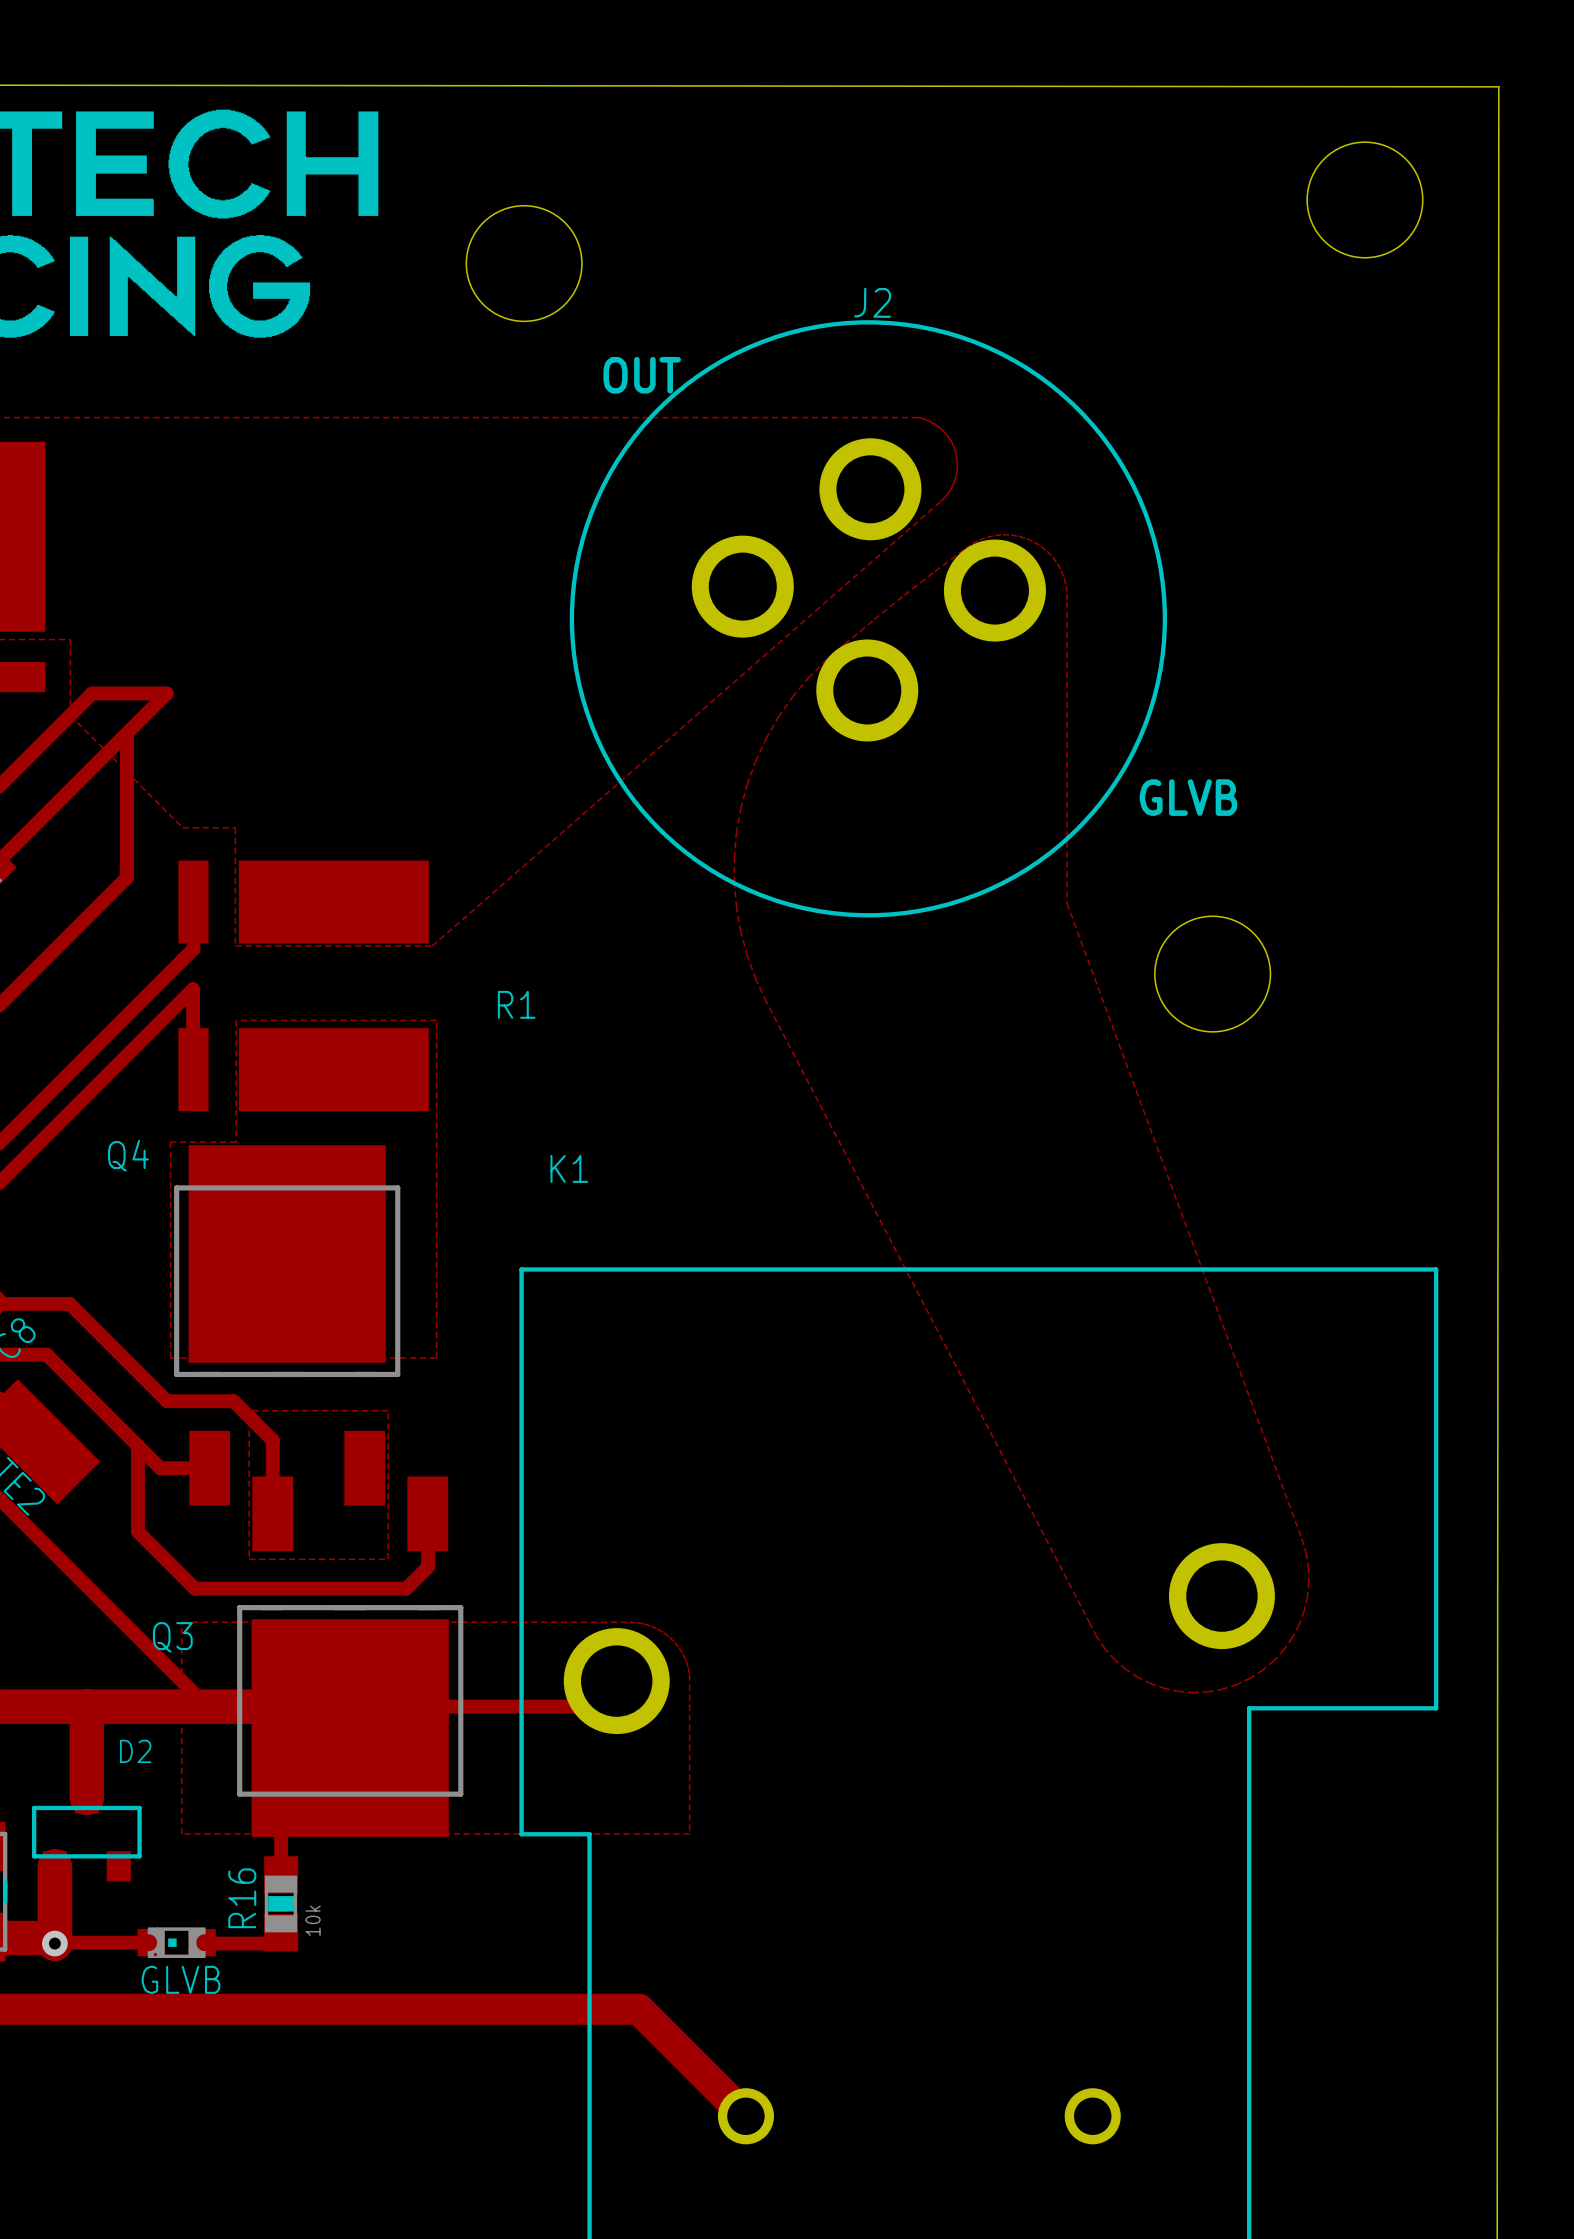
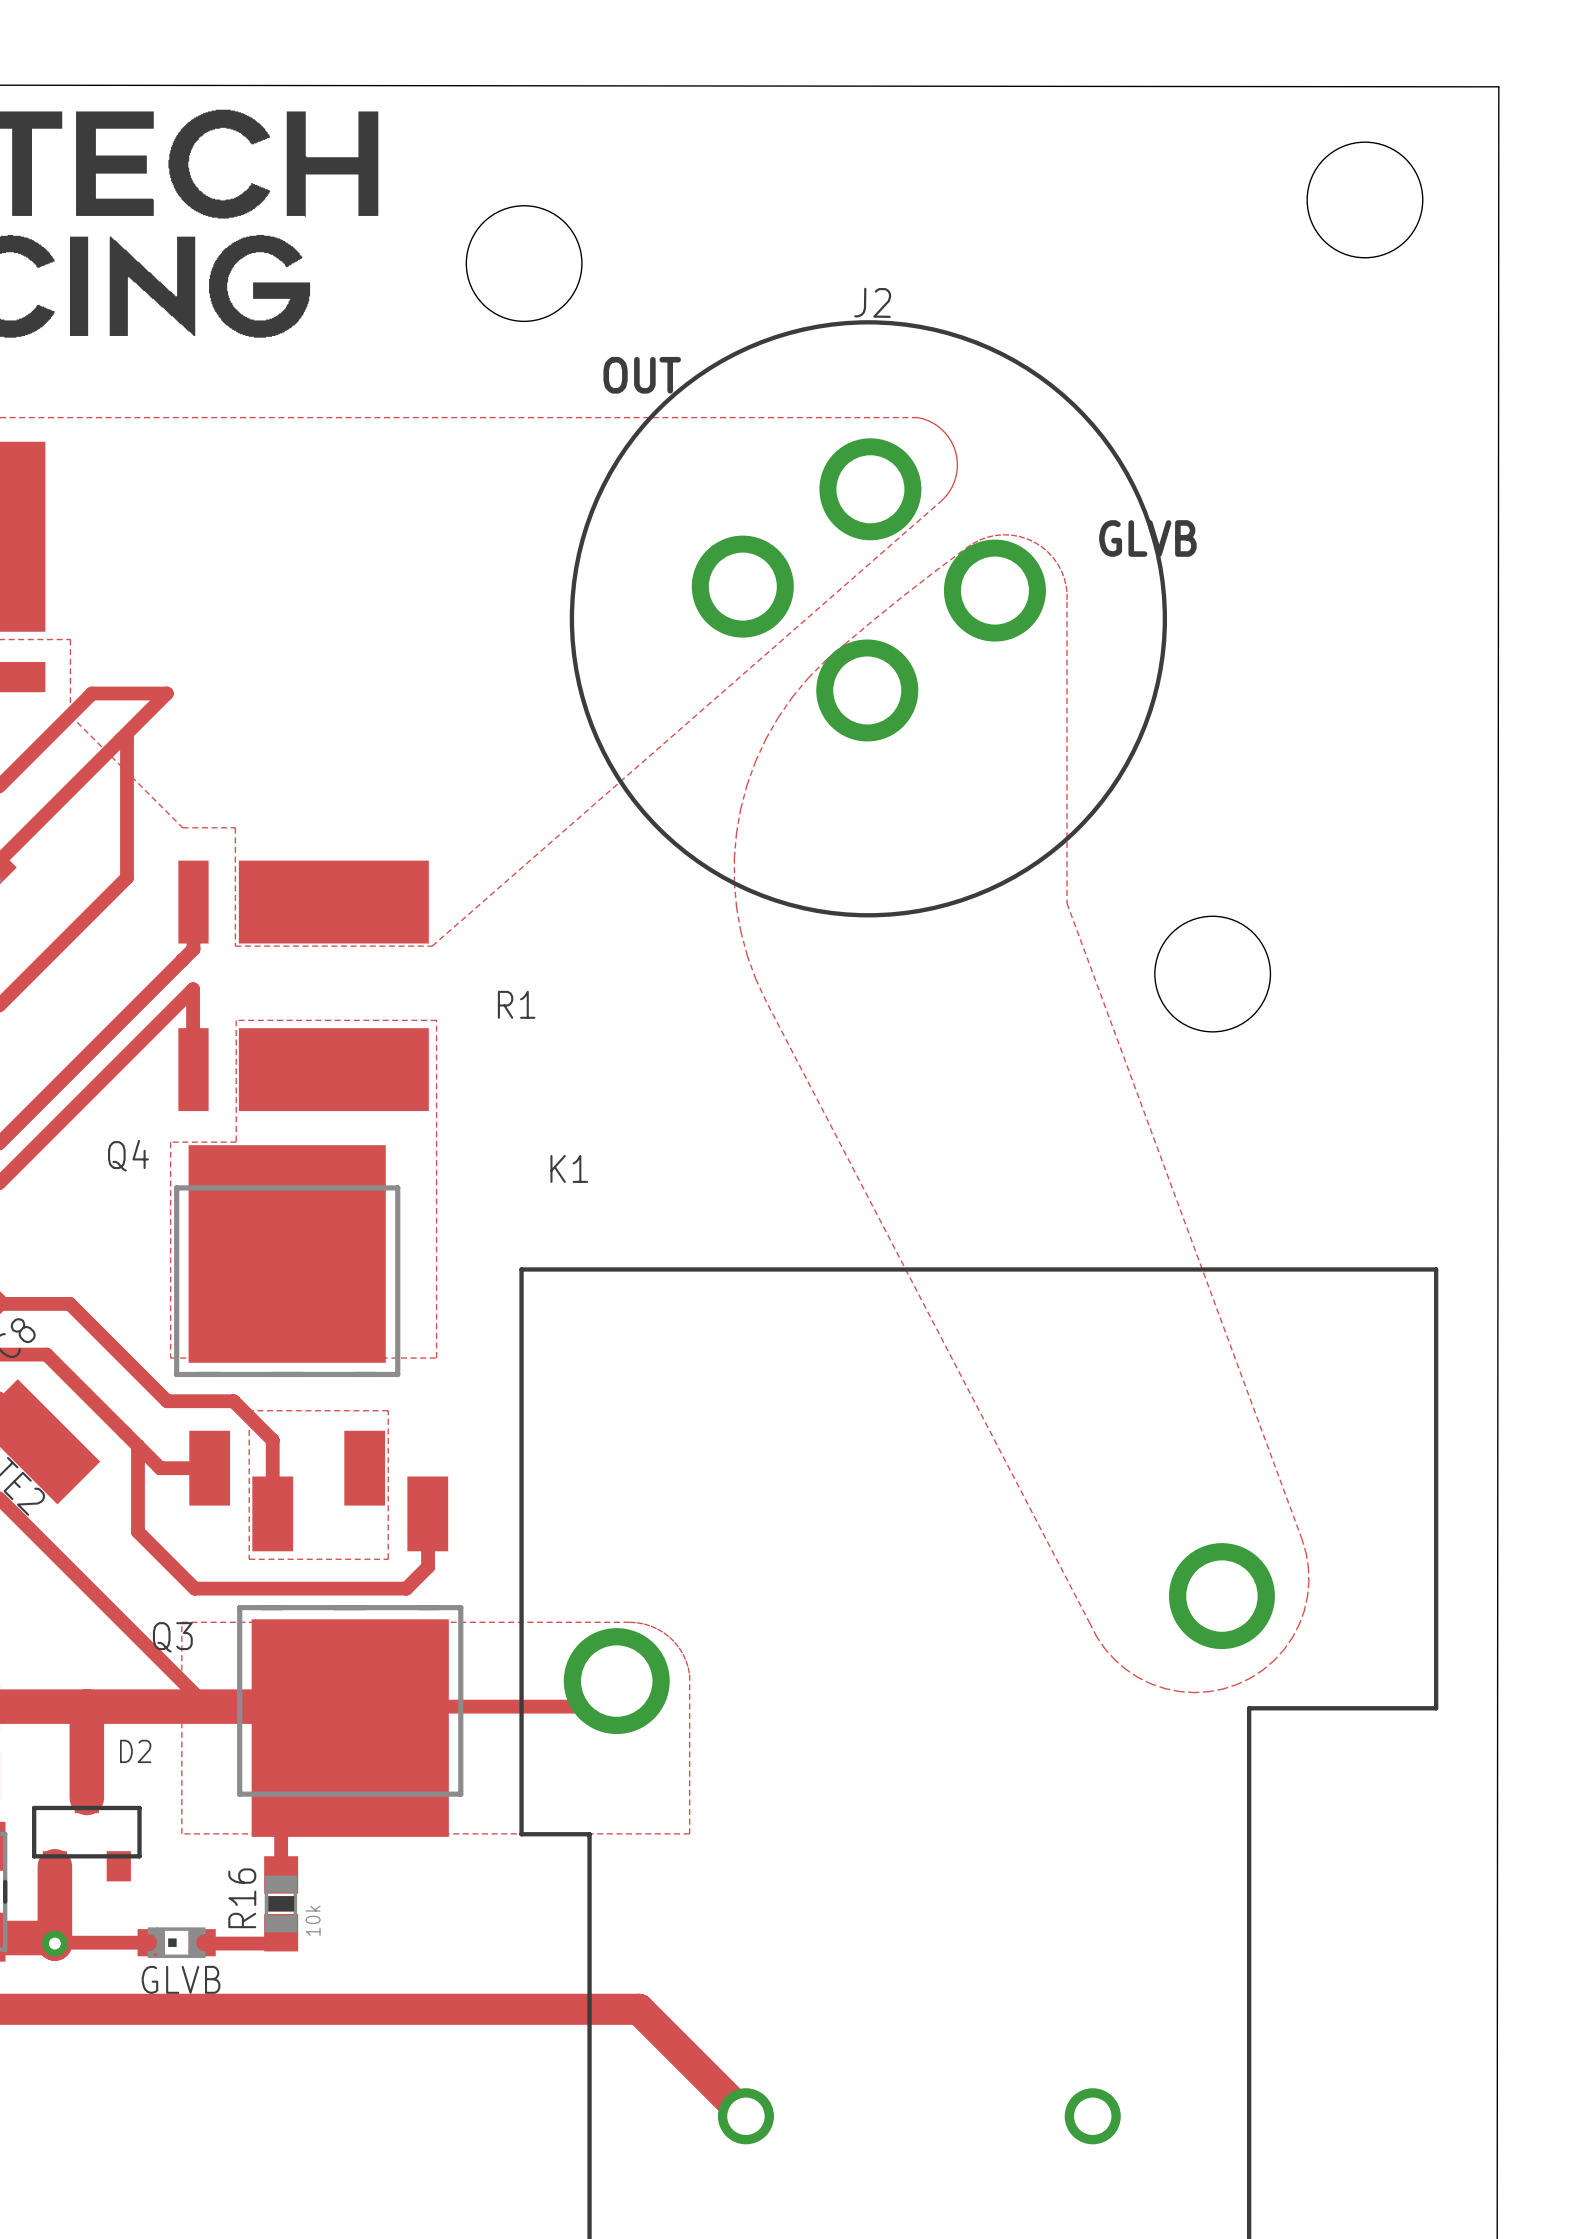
text position: GLVB (1188, 797) -> GLVB (1147, 538)

